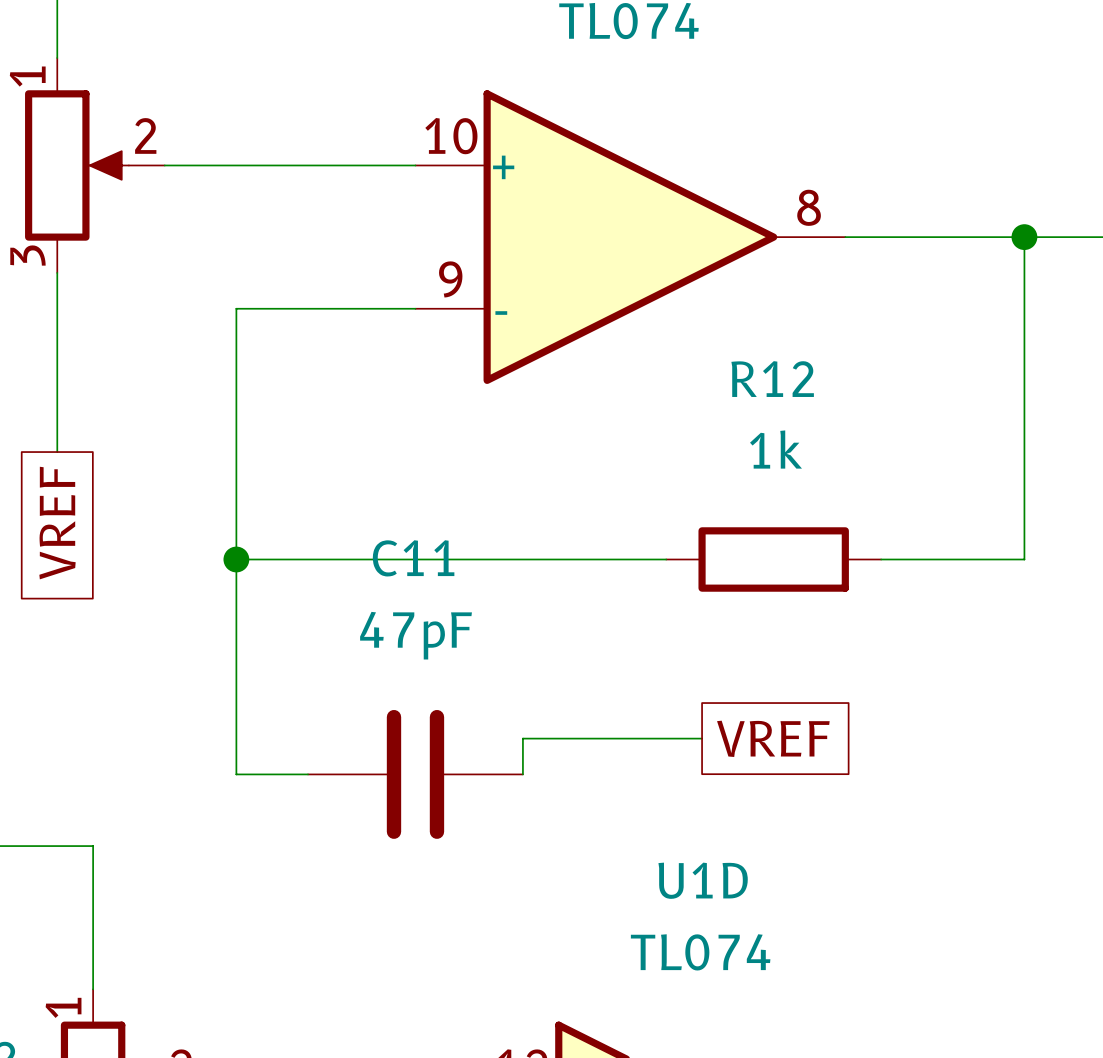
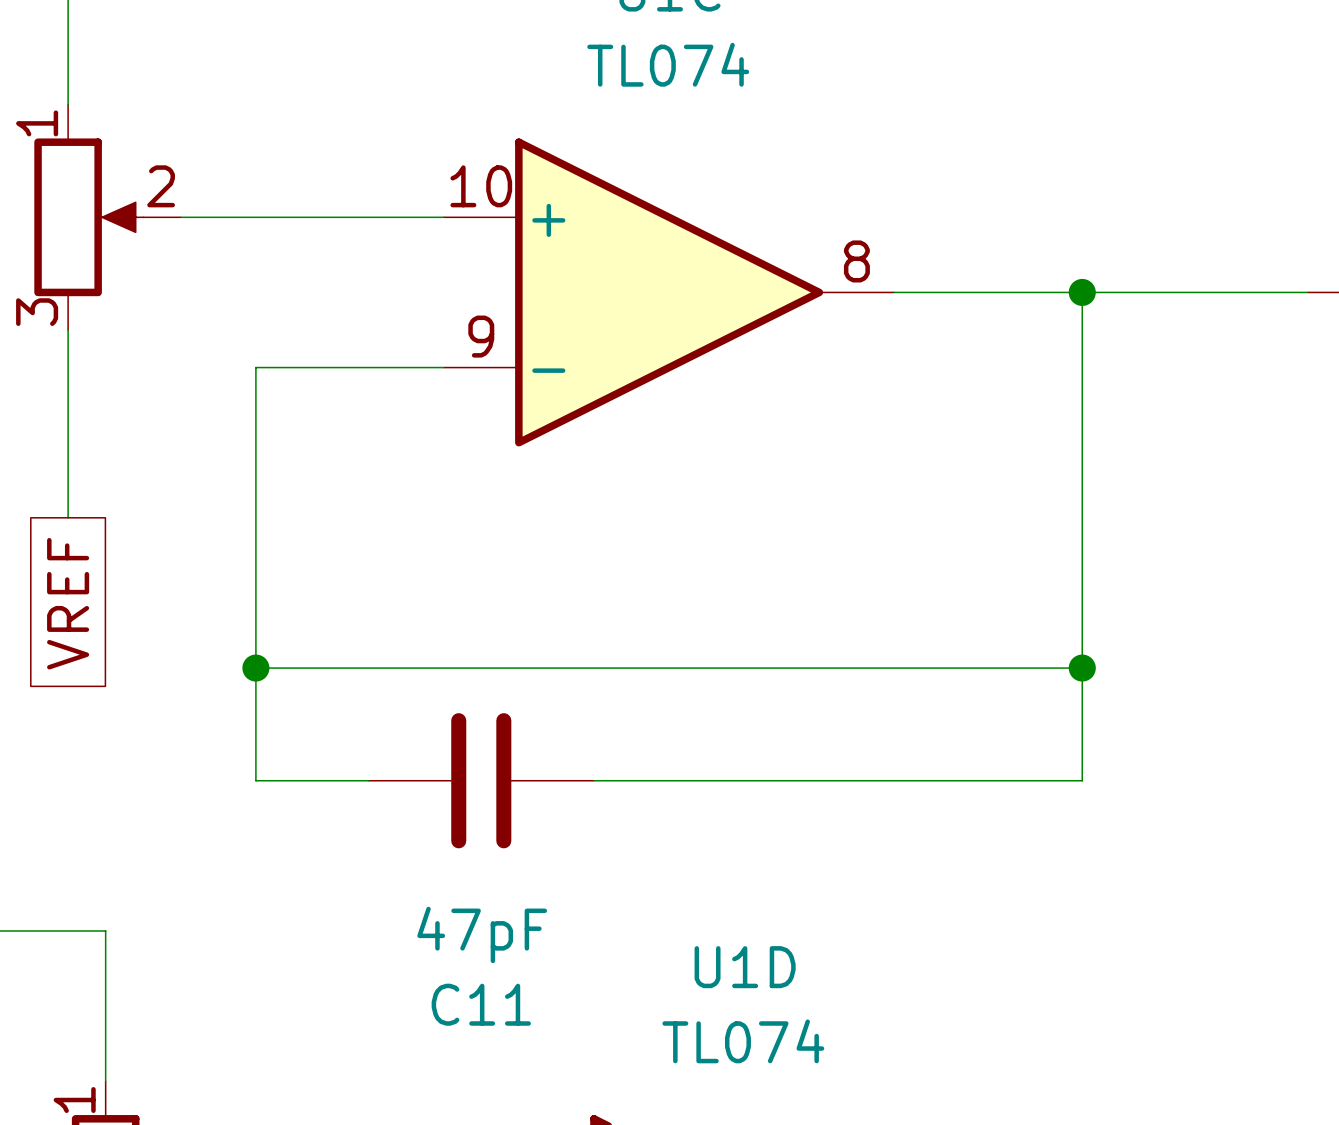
C11 name position: C11 (413, 558) -> C11 (481, 1004)
wire: (236, 559) (666, 559) -> none
junction position: (236, 559) -> (255, 668)
R12: 1k (773, 559) -> none
wire: (881, 559) (1024, 559) -> (593, 780) (1082, 780) (1082, 630)
wire: none -> (255, 668) (1082, 668)
junction: none -> (1082, 668)
C11 value position: 47pF (416, 635) -> 47pF (482, 934)
wire: (236, 702) (236, 774) (308, 774) -> (255, 780) (368, 780)
wire: (702, 738) (522, 738) (522, 774) -> none
global label: VREF (773, 738) -> none
C11 position: (415, 774) -> (481, 780)

